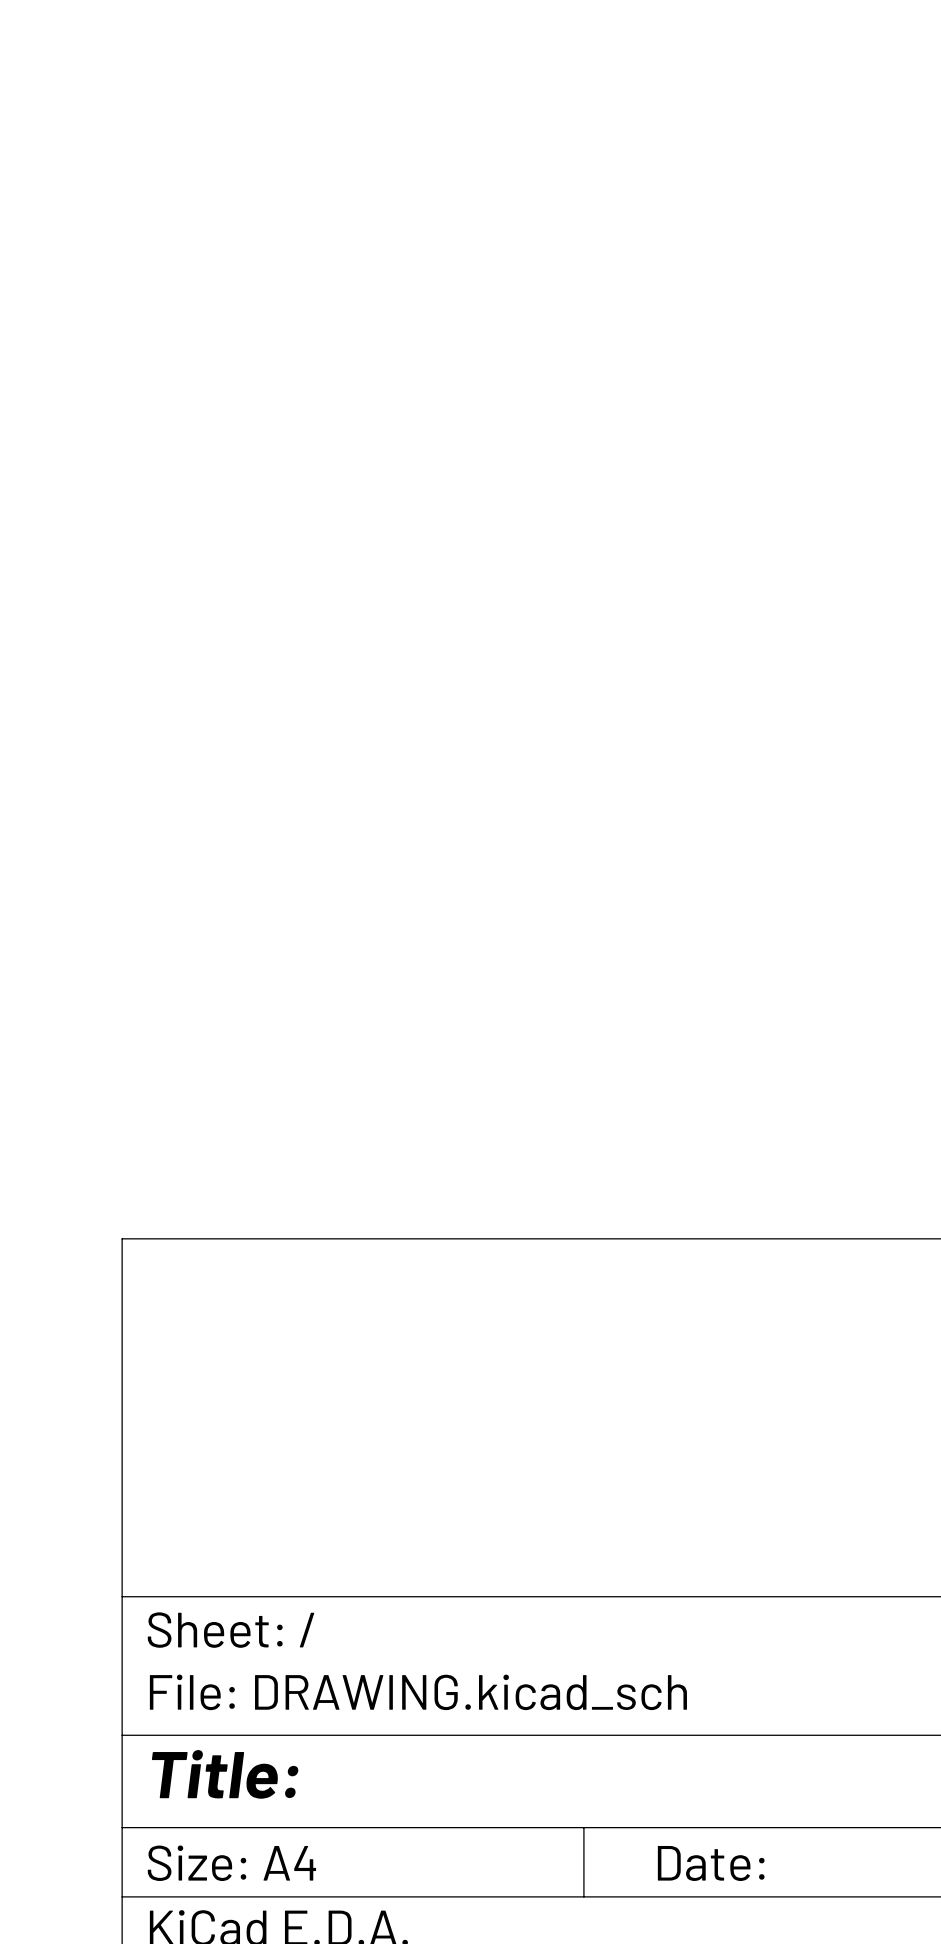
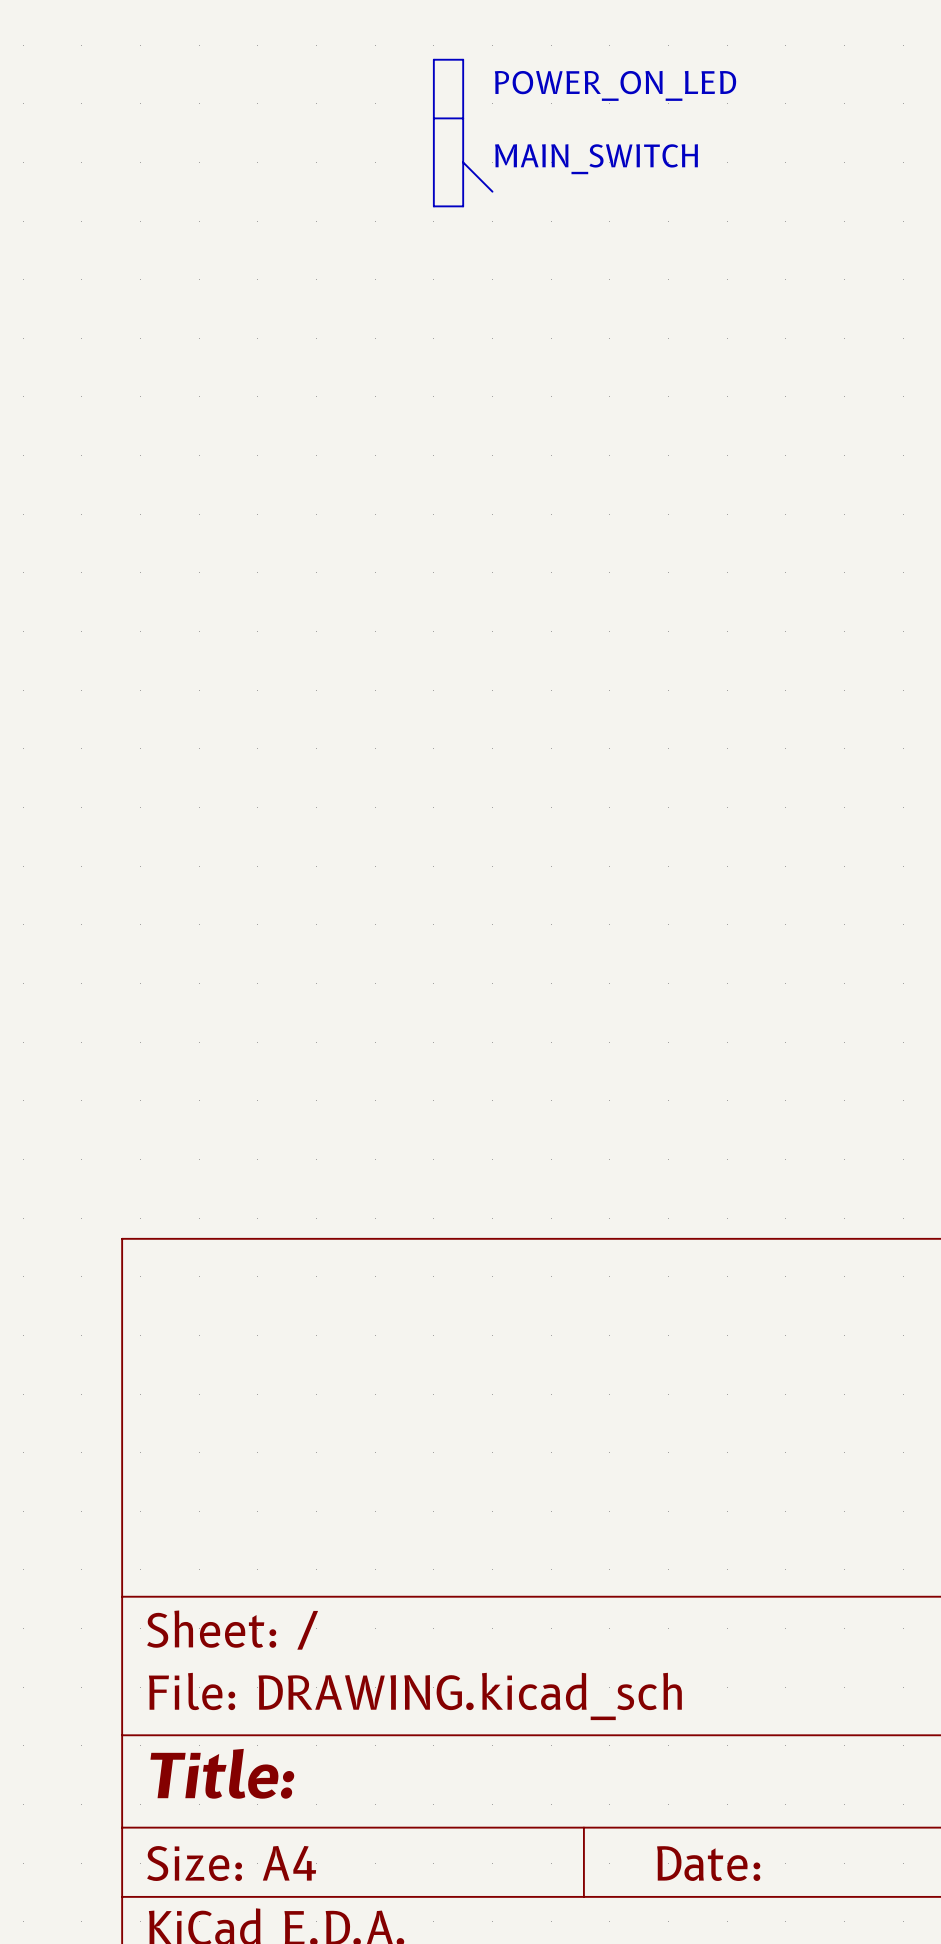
line: none -> (433, 59) (433, 206) (463, 206) (463, 59) (433, 59)
text: none -> POWER_ON_LED (615, 85)
line: none -> (433, 118) (463, 118)
text: none -> MAIN_SWITCH (596, 159)
line: none -> (463, 162) (492, 191)

